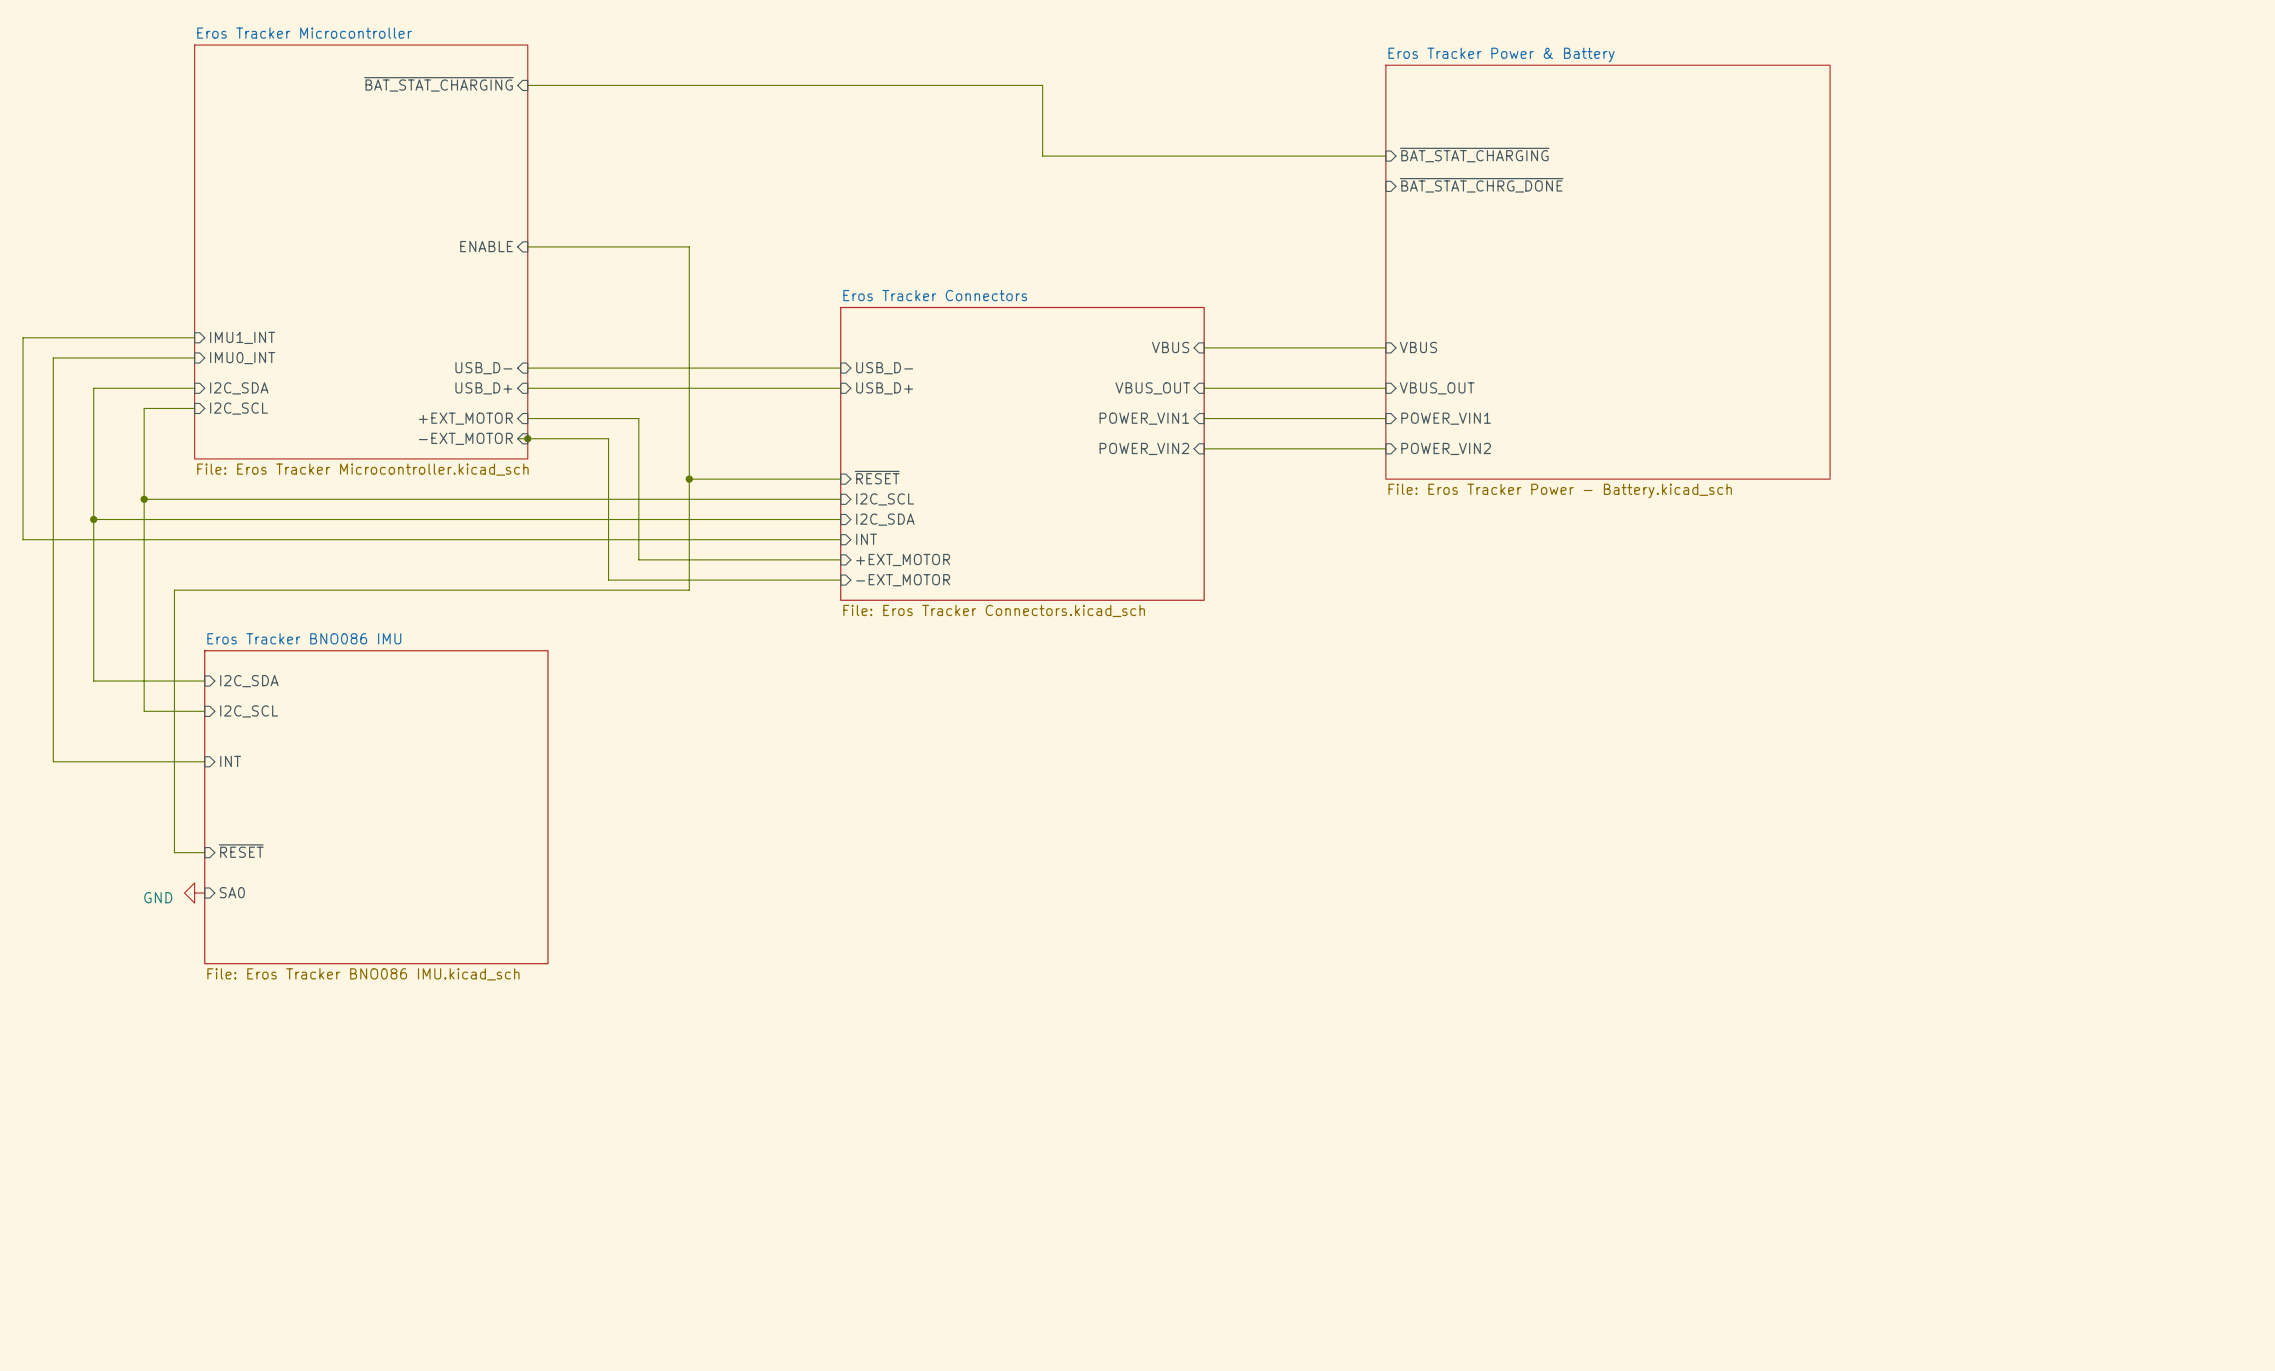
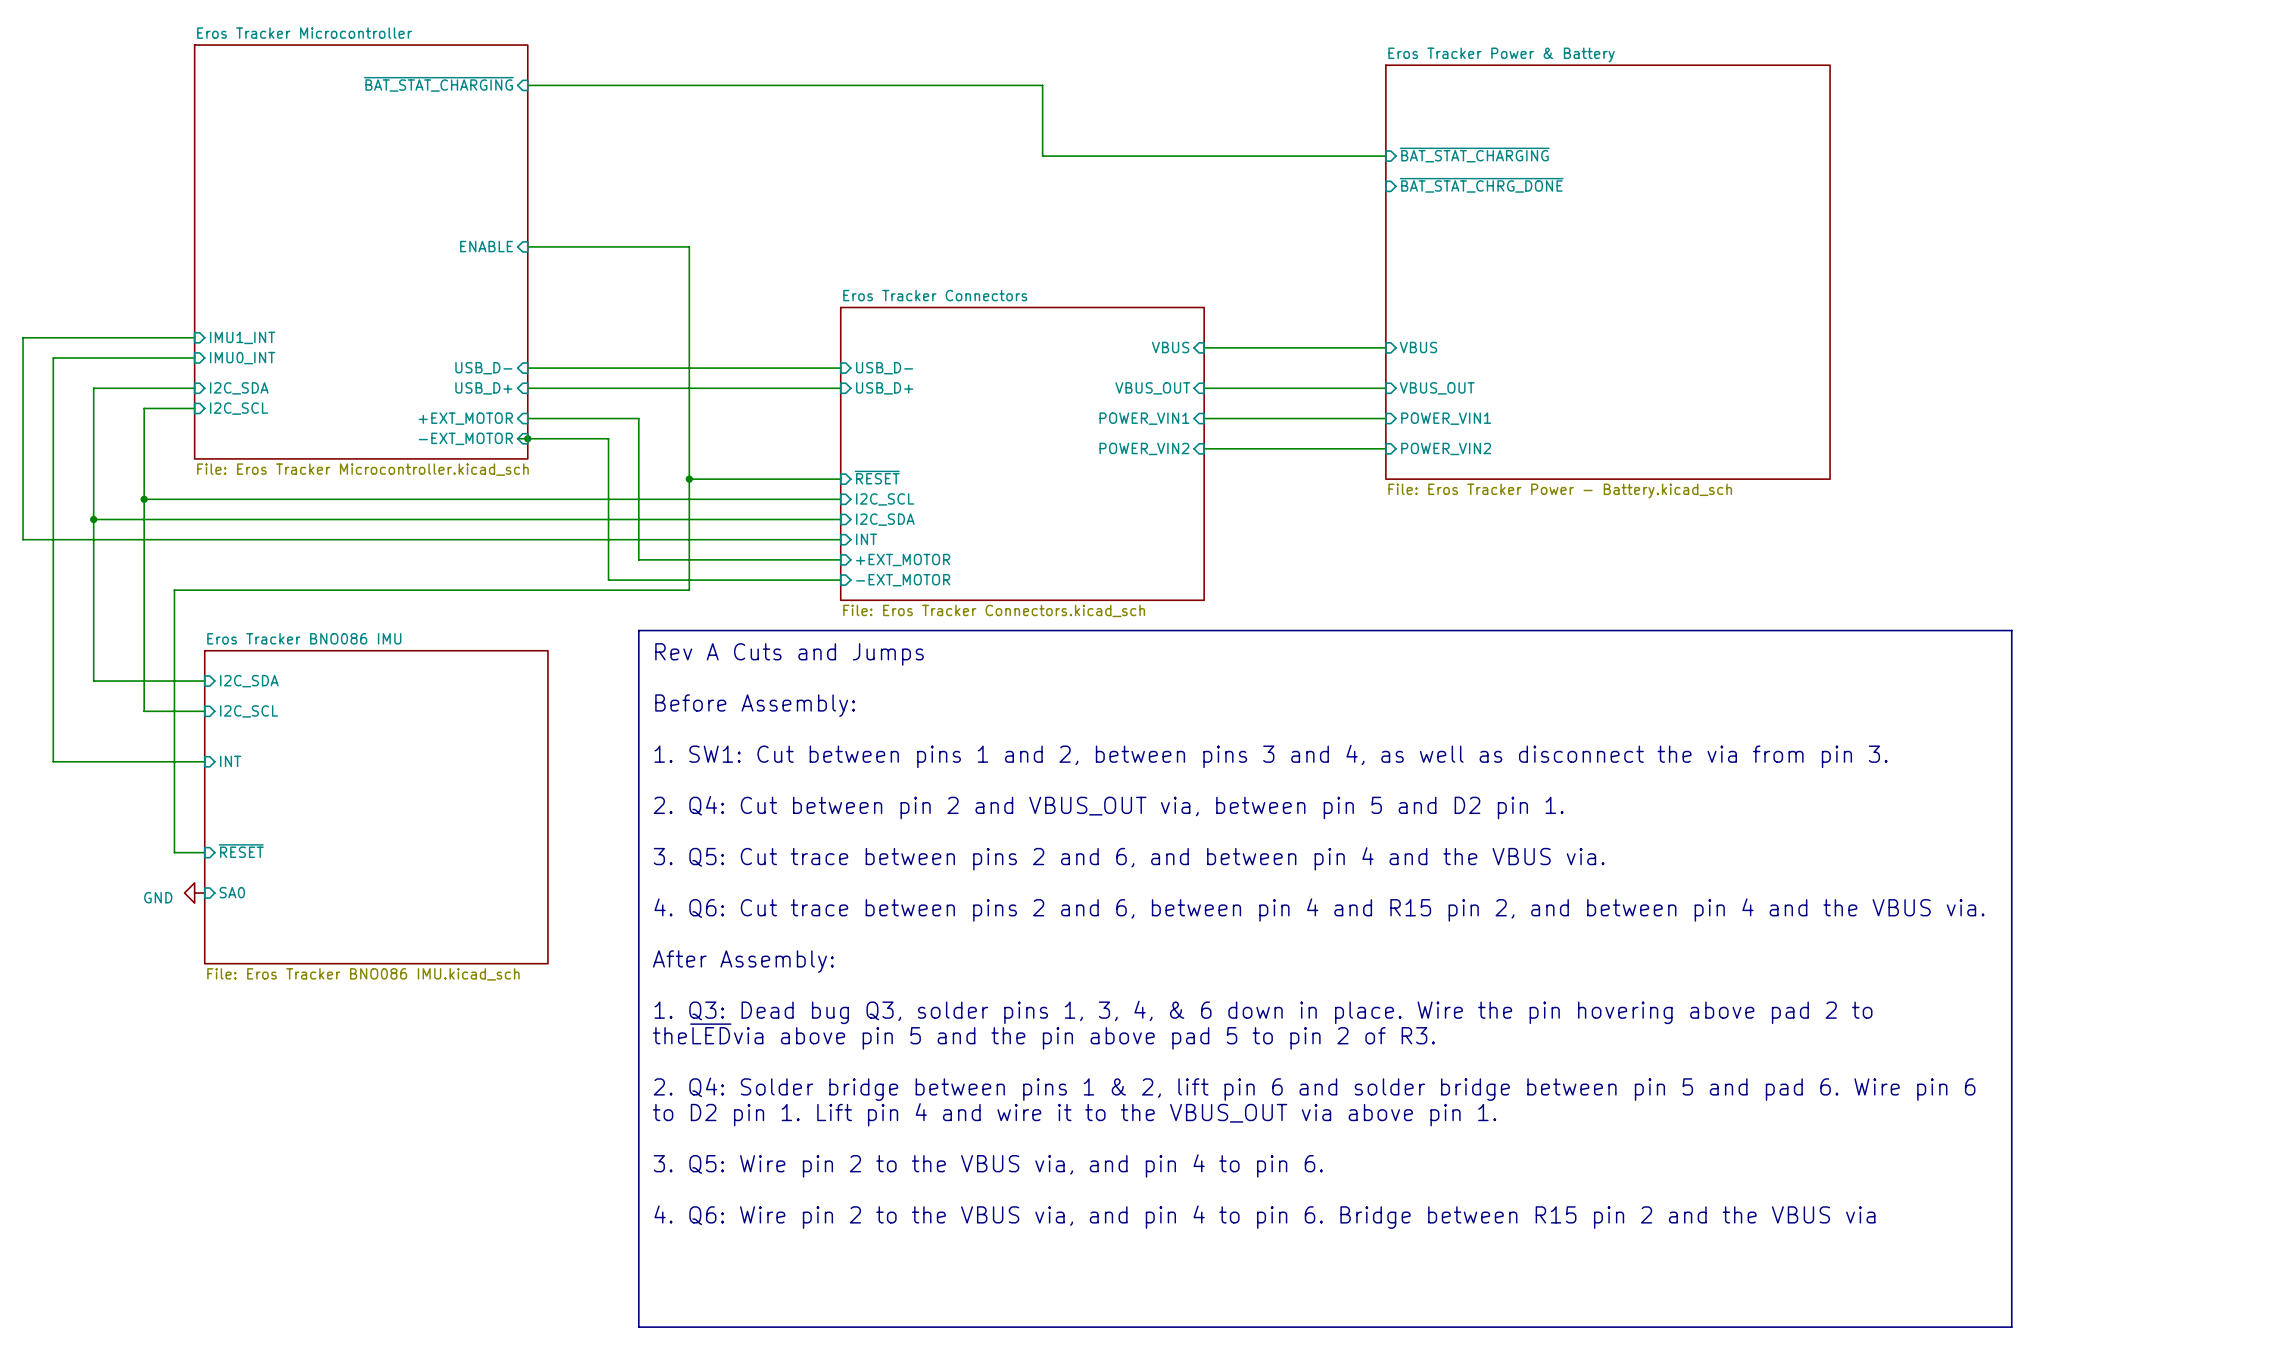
line: none -> (638, 630) (2011, 630) (2011, 1327) (638, 1327) (638, 630)
text: none -> Rev A Cuts and Jumps (789, 654)
text: none -> Before Assembly: (755, 705)
text: none -> 1. SW1: Cut between pins 1 and 2, between pins 3 and 4, as well as disconnect the via from pin 3. (1271, 756)
text: none -> 2. Q4: Cut between pin 2 and VBUS_OUT via, between pin 5 and D2 pin 1. (1108, 807)
text: none -> 3. Q5: Cut trace between pins 2 and 6, and between pin 4 and the VBUS via. (1129, 858)
text: none -> 4. Q6: Cut trace between pins 2 and 6, between pin 4 and R15 pin 2, and between pin 4 and the VBUS via. (1319, 910)
text: none -> After Assembly: (743, 961)
text: none -> 1. Q3: Dead bug Q3, solder pins 1, 3, 4, & 6 down in place. Wire the pin hovering above pad 2 to (1263, 1012)
text: none -> the~{LED}via above pin 5 and the pin above pad 5 to pin 2 of R3. (1043, 1036)
text: none -> 2. Q4: Solder bridge between pins 1 & 2, lift pin 6 and solder bridge between pin 5 and pad 6. Wire pin 6 (1314, 1089)
text: none -> to D2 pin 1. Lift pin 4 and wire it to the VBUS_OUT via above pin 1. (1074, 1114)
text: none -> 3. Q5: Wire pin 2 to the VBUS via, and pin 4 to pin 6. (988, 1165)
text: none -> 4. Q6: Wire pin 2 to the VBUS via, and pin 4 to pin 6. Bridge between R15 pin 2 and the VBUS via (1264, 1217)

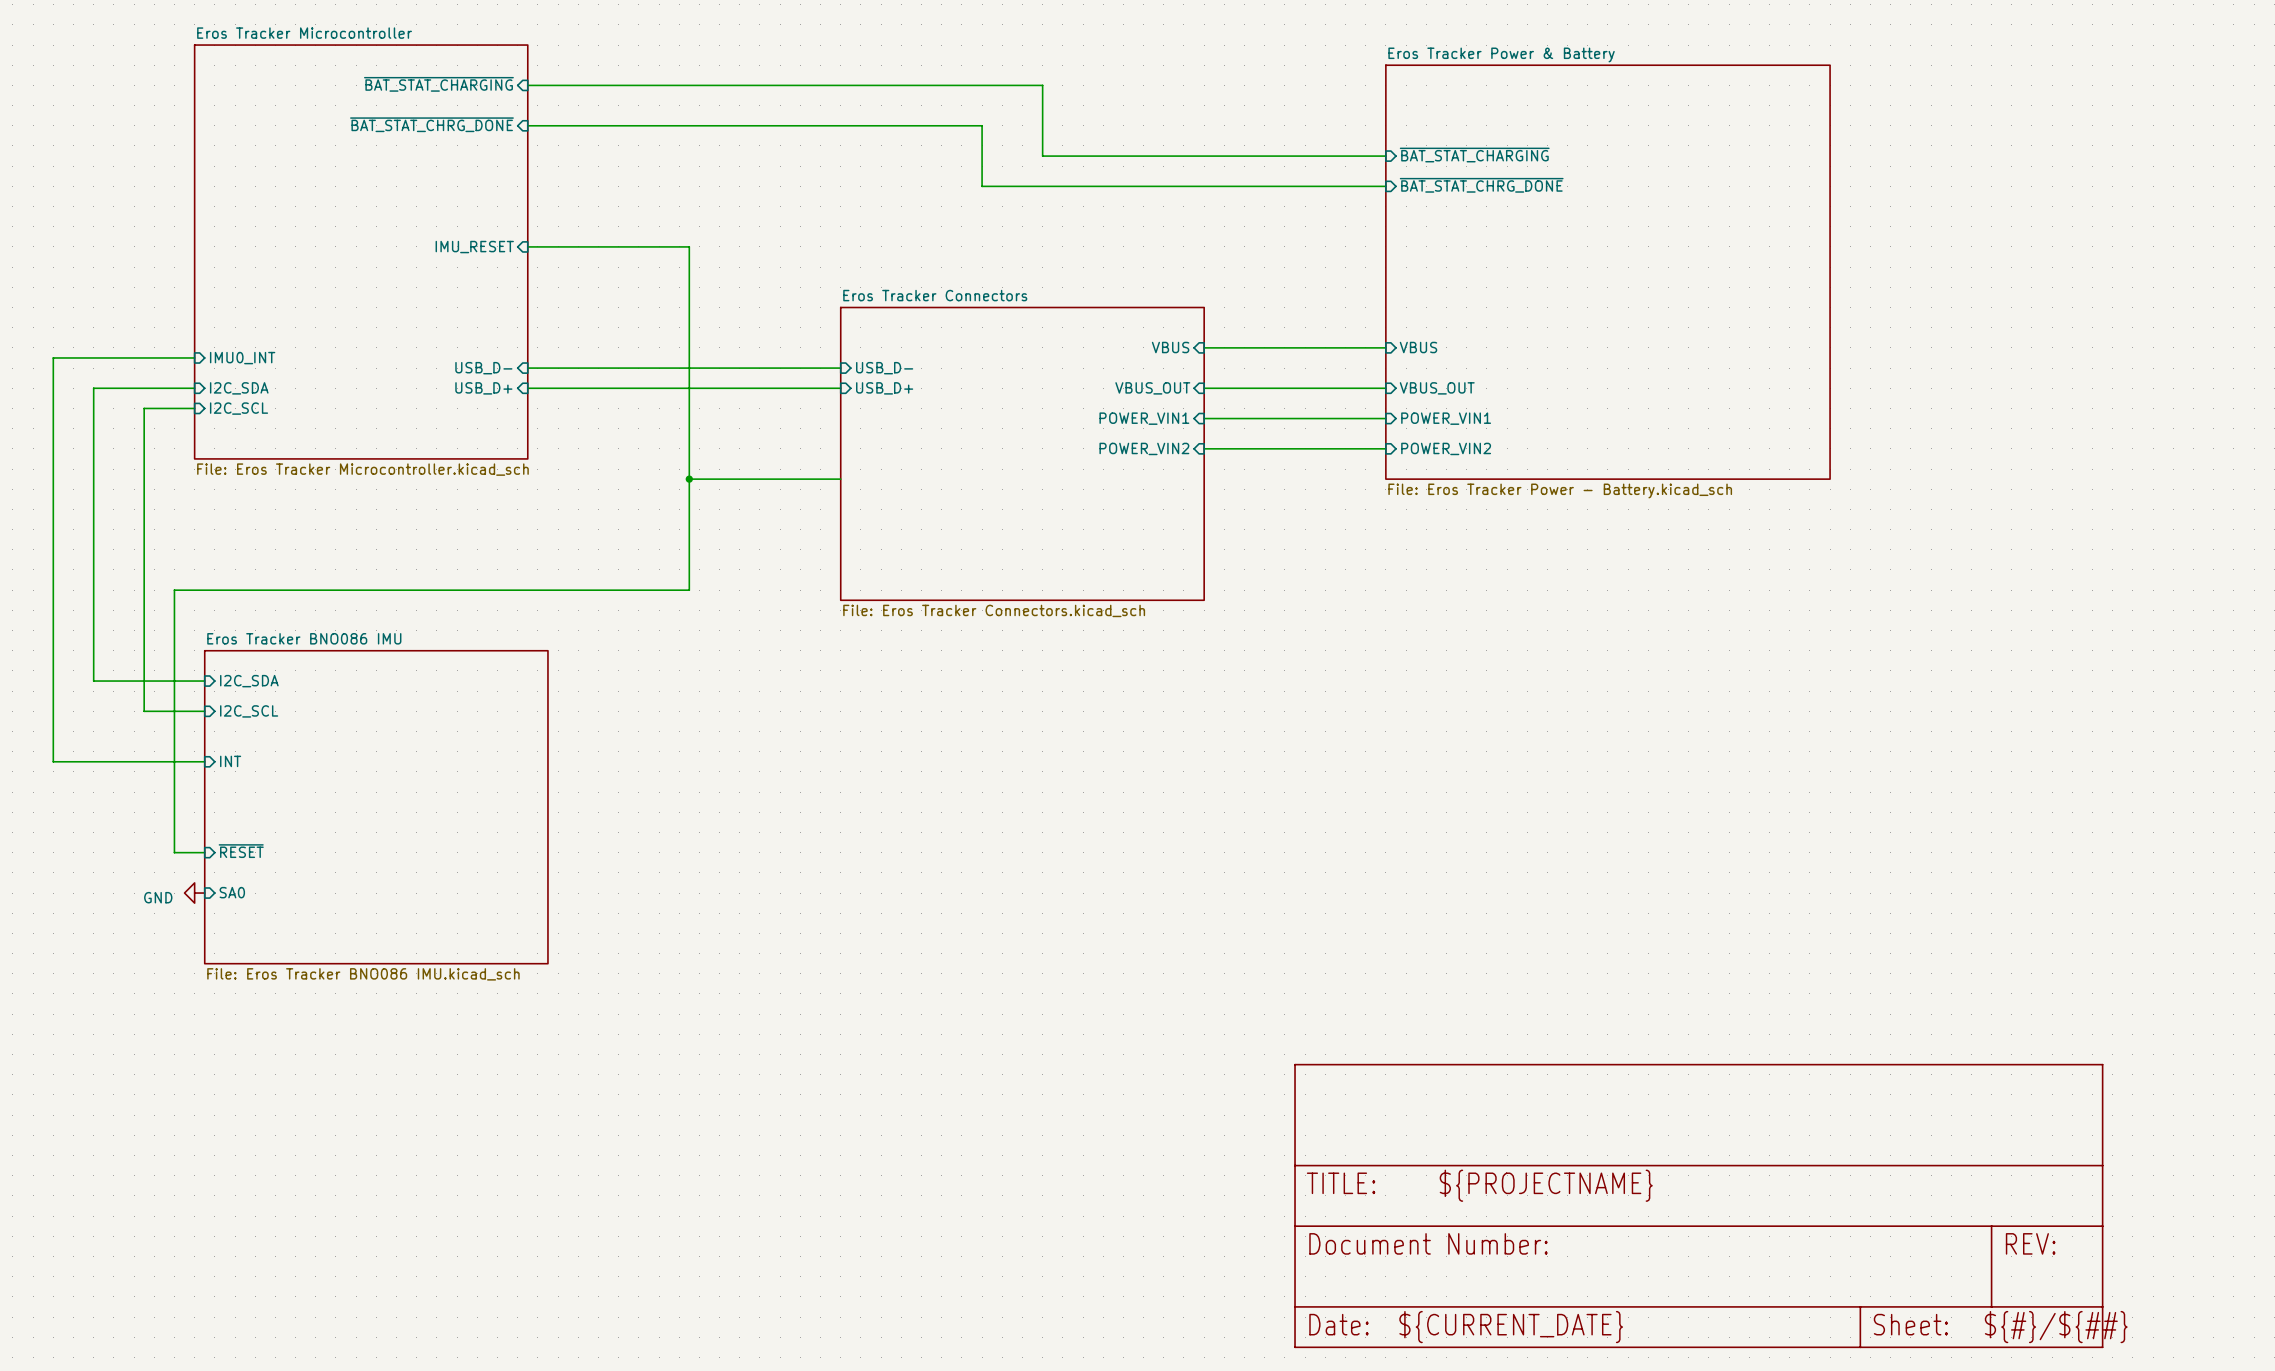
sheet pin: none -> ~{BAT_STAT_CHRG_DONE} (431, 124)
wire: none -> (527, 125) (982, 125) (982, 186) (1385, 186)
sheet pin: ENABLE (486, 246) -> IMU_RESET (474, 247)
wire: (194, 337) (23, 337) (23, 539) (840, 539) -> none
sheet pin: IMU1_INT (242, 337) -> none
sheet pin: +EXT_MOTOR (465, 418) -> none
wire: (527, 418) (638, 418) (638, 559) (840, 559) -> none
sheet pin: -EXT_MOTOR (465, 438) -> none
wire: (517, 438) (608, 438) (608, 580) (840, 580) -> none
junction: (527, 438) -> none
sheet pin: ~{RESET} (877, 477) -> none
wire: (144, 499) (840, 499) -> none
junction: (144, 499) -> none
sheet pin: I2C_SCL (885, 499) -> none
wire: (93, 519) (840, 519) -> none
junction: (93, 519) -> none
sheet pin: I2C_SDA (885, 519) -> none
sheet pin: INT (866, 539) -> none
sheet pin: +EXT_MOTOR (903, 559) -> none
sheet pin: -EXT_MOTOR (903, 580) -> none
line: (638, 630) (2011, 630) (2011, 1327) (638, 1327) (638, 630) -> none
text: Rev A Cuts and Jumps (789, 654) -> none
text: Before Assembly: (755, 705) -> none
text: 1. SW1: Cut between pins 1 and 2, between pins 3 and 4, as well as disconnect the via from pin 3. (1271, 756) -> none
text: 2. Q4: Cut between pin 2 and VBUS_OUT via, between pin 5 and D2 pin 1. (1108, 807) -> none
text: 3. Q5: Cut trace between pins 2 and 6, and between pin 4 and the VBUS via. (1129, 858) -> none
text: 4. Q6: Cut trace between pins 2 and 6, between pin 4 and R15 pin 2, and between pin 4 and the VBUS via. (1319, 910) -> none
text: After Assembly: (743, 961) -> none
text: 1. Q3: Dead bug Q3, solder pins 1, 3, 4, & 6 down in place. Wire the pin hovering above pad 2 to (1263, 1012) -> none
text: the~{LED}via above pin 5 and the pin above pad 5 to pin 2 of R3. (1043, 1036) -> none
text: 2. Q4: Solder bridge between pins 1 & 2, lift pin 6 and solder bridge between pin 5 and pad 6. Wire pin 6 (1314, 1089) -> none
text: to D2 pin 1. Lift pin 4 and wire it to the VBUS_OUT via above pin 1. (1074, 1114) -> none
text: 3. Q5: Wire pin 2 to the VBUS via, and pin 4 to pin 6. (988, 1165) -> none
power symbol: none -> (1698, 1205)
text: 4. Q6: Wire pin 2 to the VBUS via, and pin 4 to pin 6. Bridge between R15 pin 2 and the VBUS via (1264, 1217) -> none

